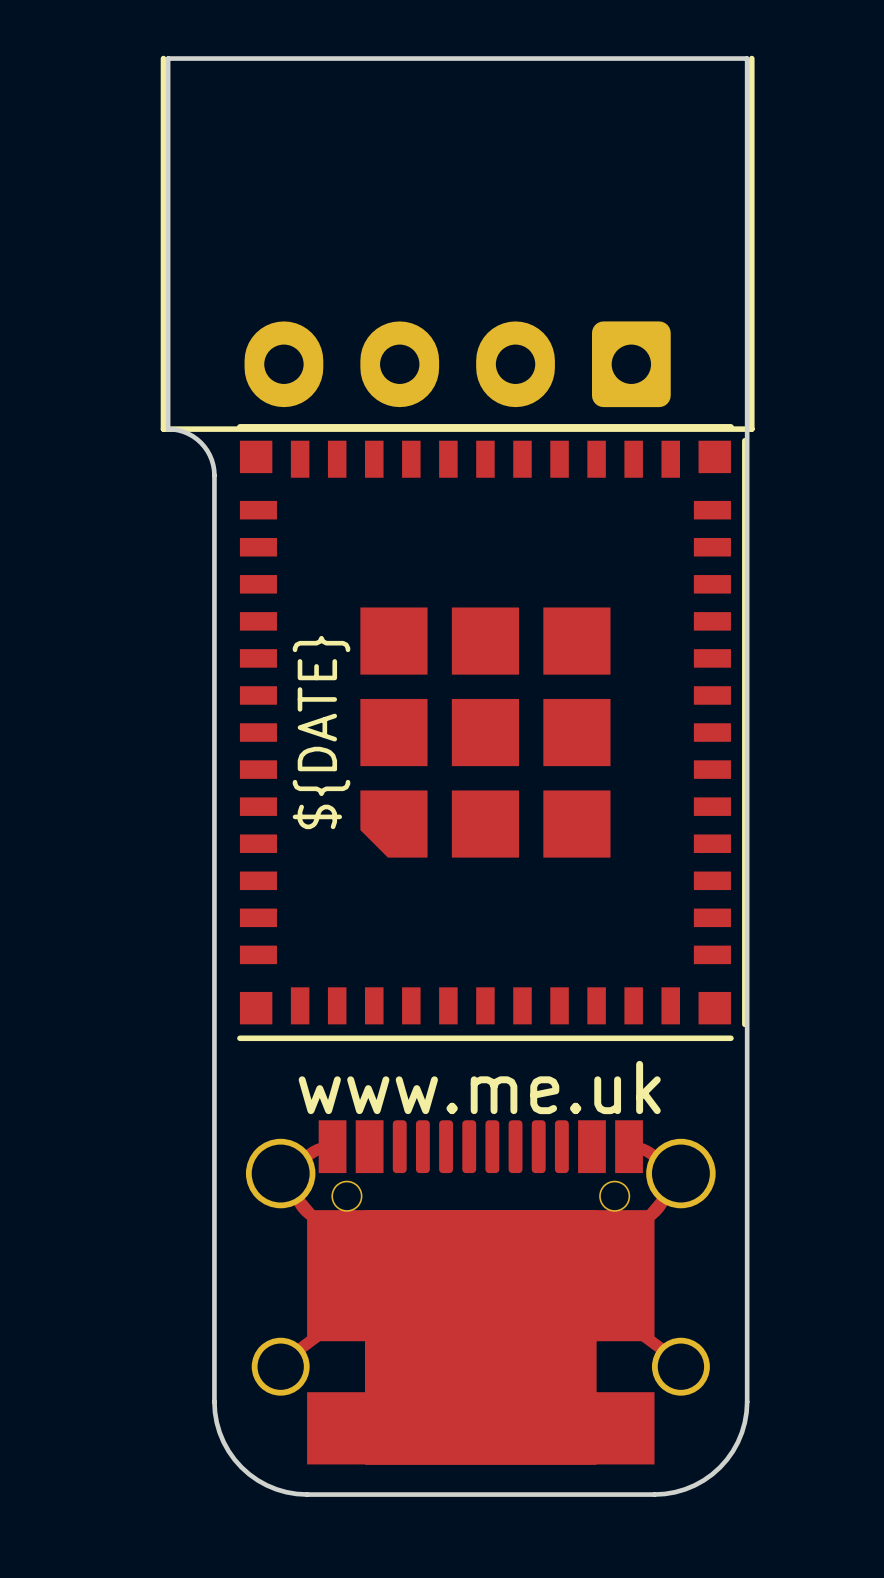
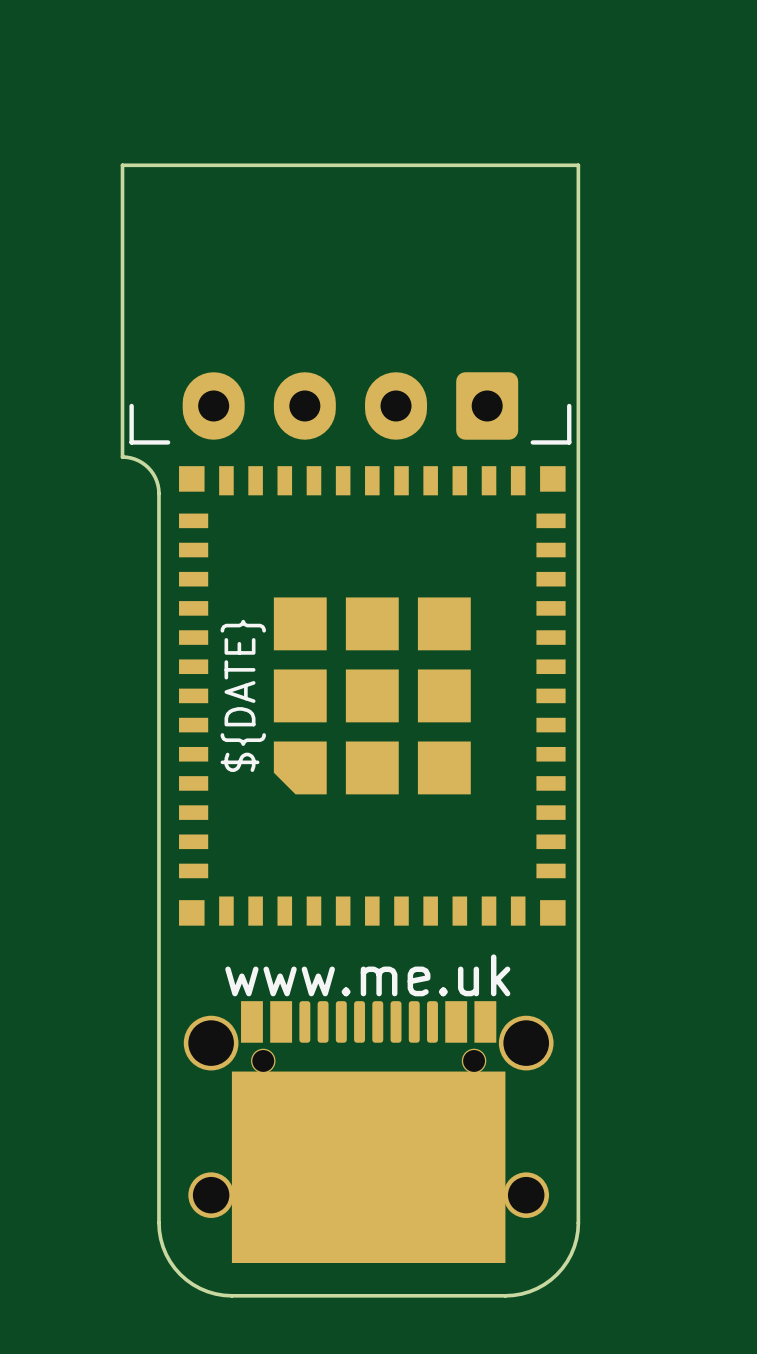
part: (457, 243) -> none
part: none -> (350, 408)
part footprint: [237, 424, 748, 1042] -> [179, 466, 566, 926]
part footprint: [245, 1120, 716, 1465] -> [183, 1001, 554, 1264]

